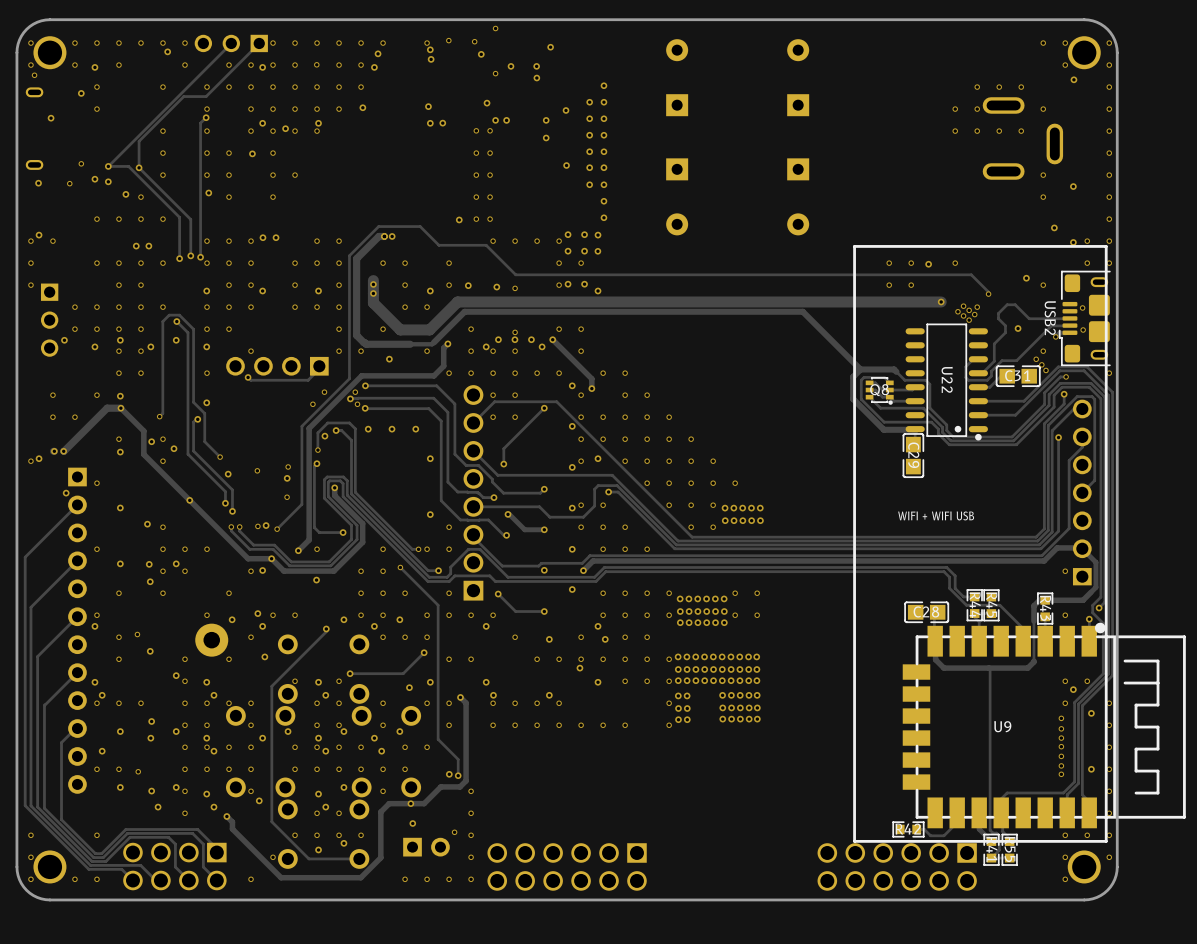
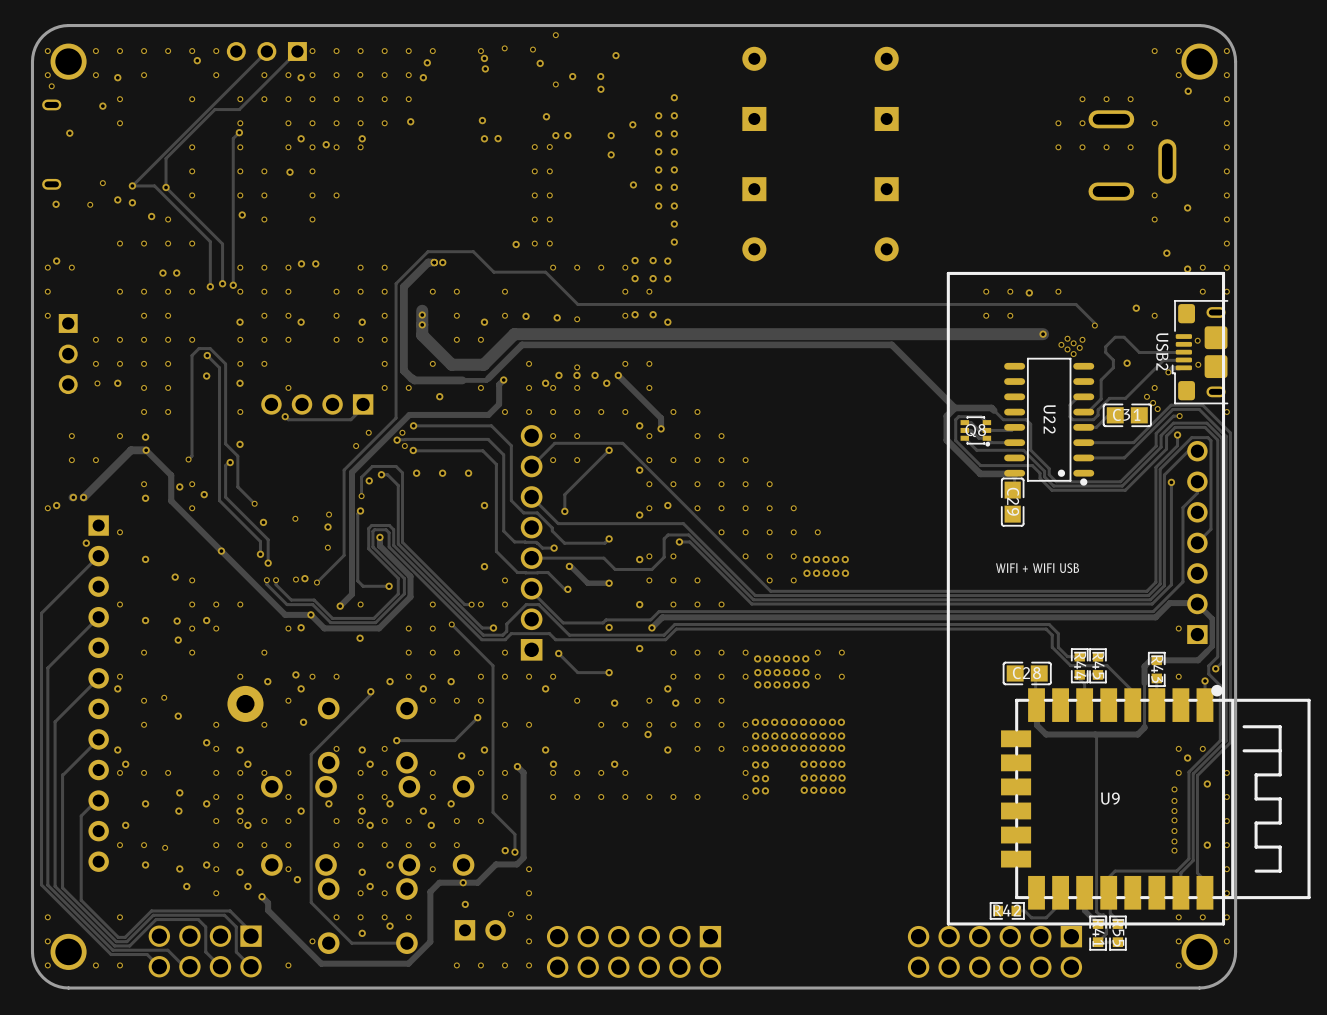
via: (64, 340) -> none
via: (120, 340) -> none
via: (150, 346) -> none
via: none -> (97, 383)

